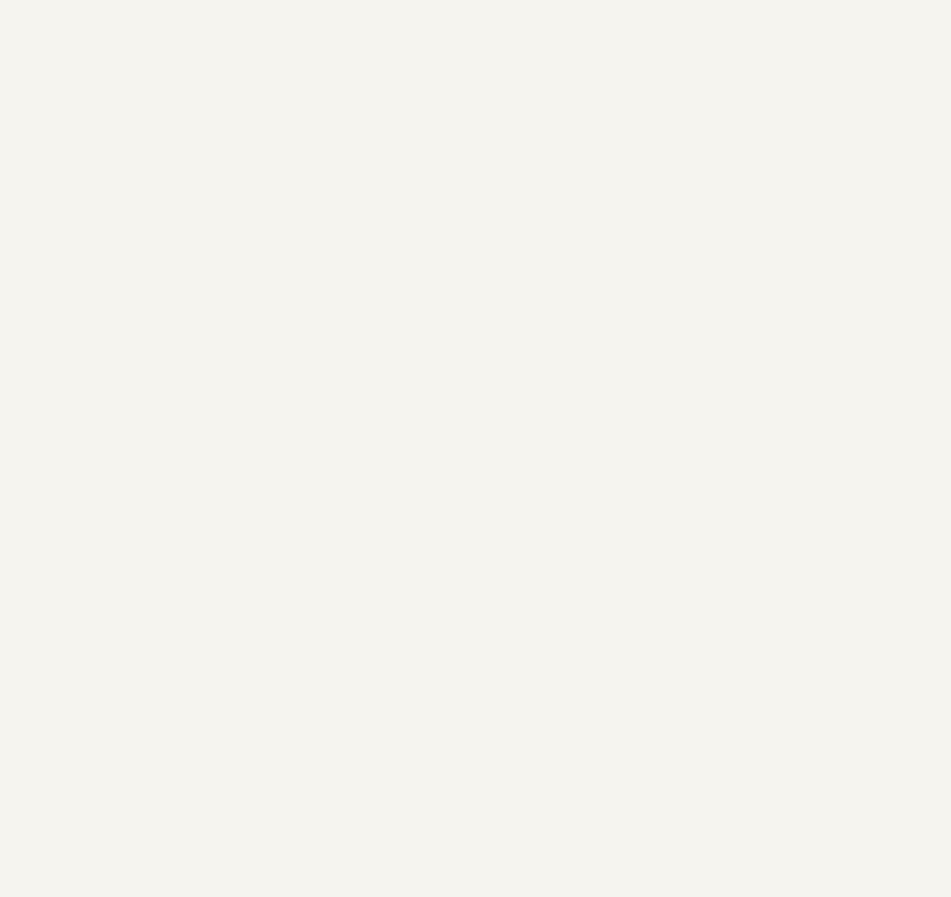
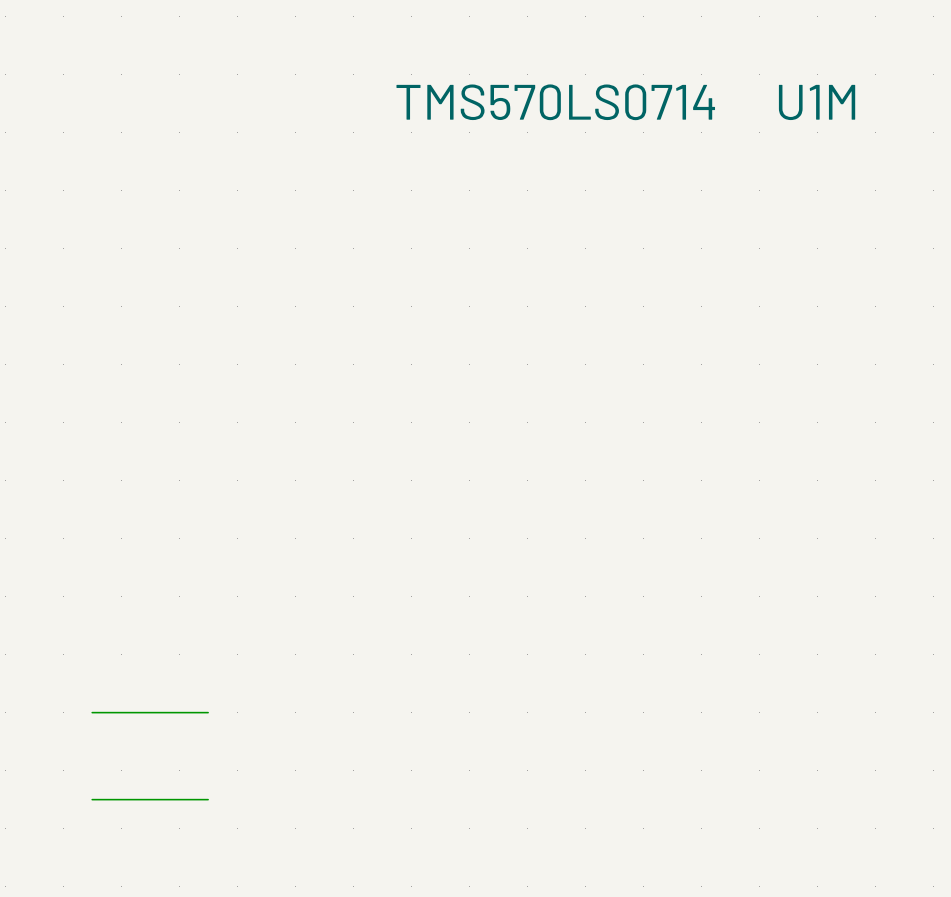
U1M: none -> TMS570LS0714 (625, 102)
wire: none -> (92, 712) (208, 712)
wire: none -> (92, 799) (208, 799)

